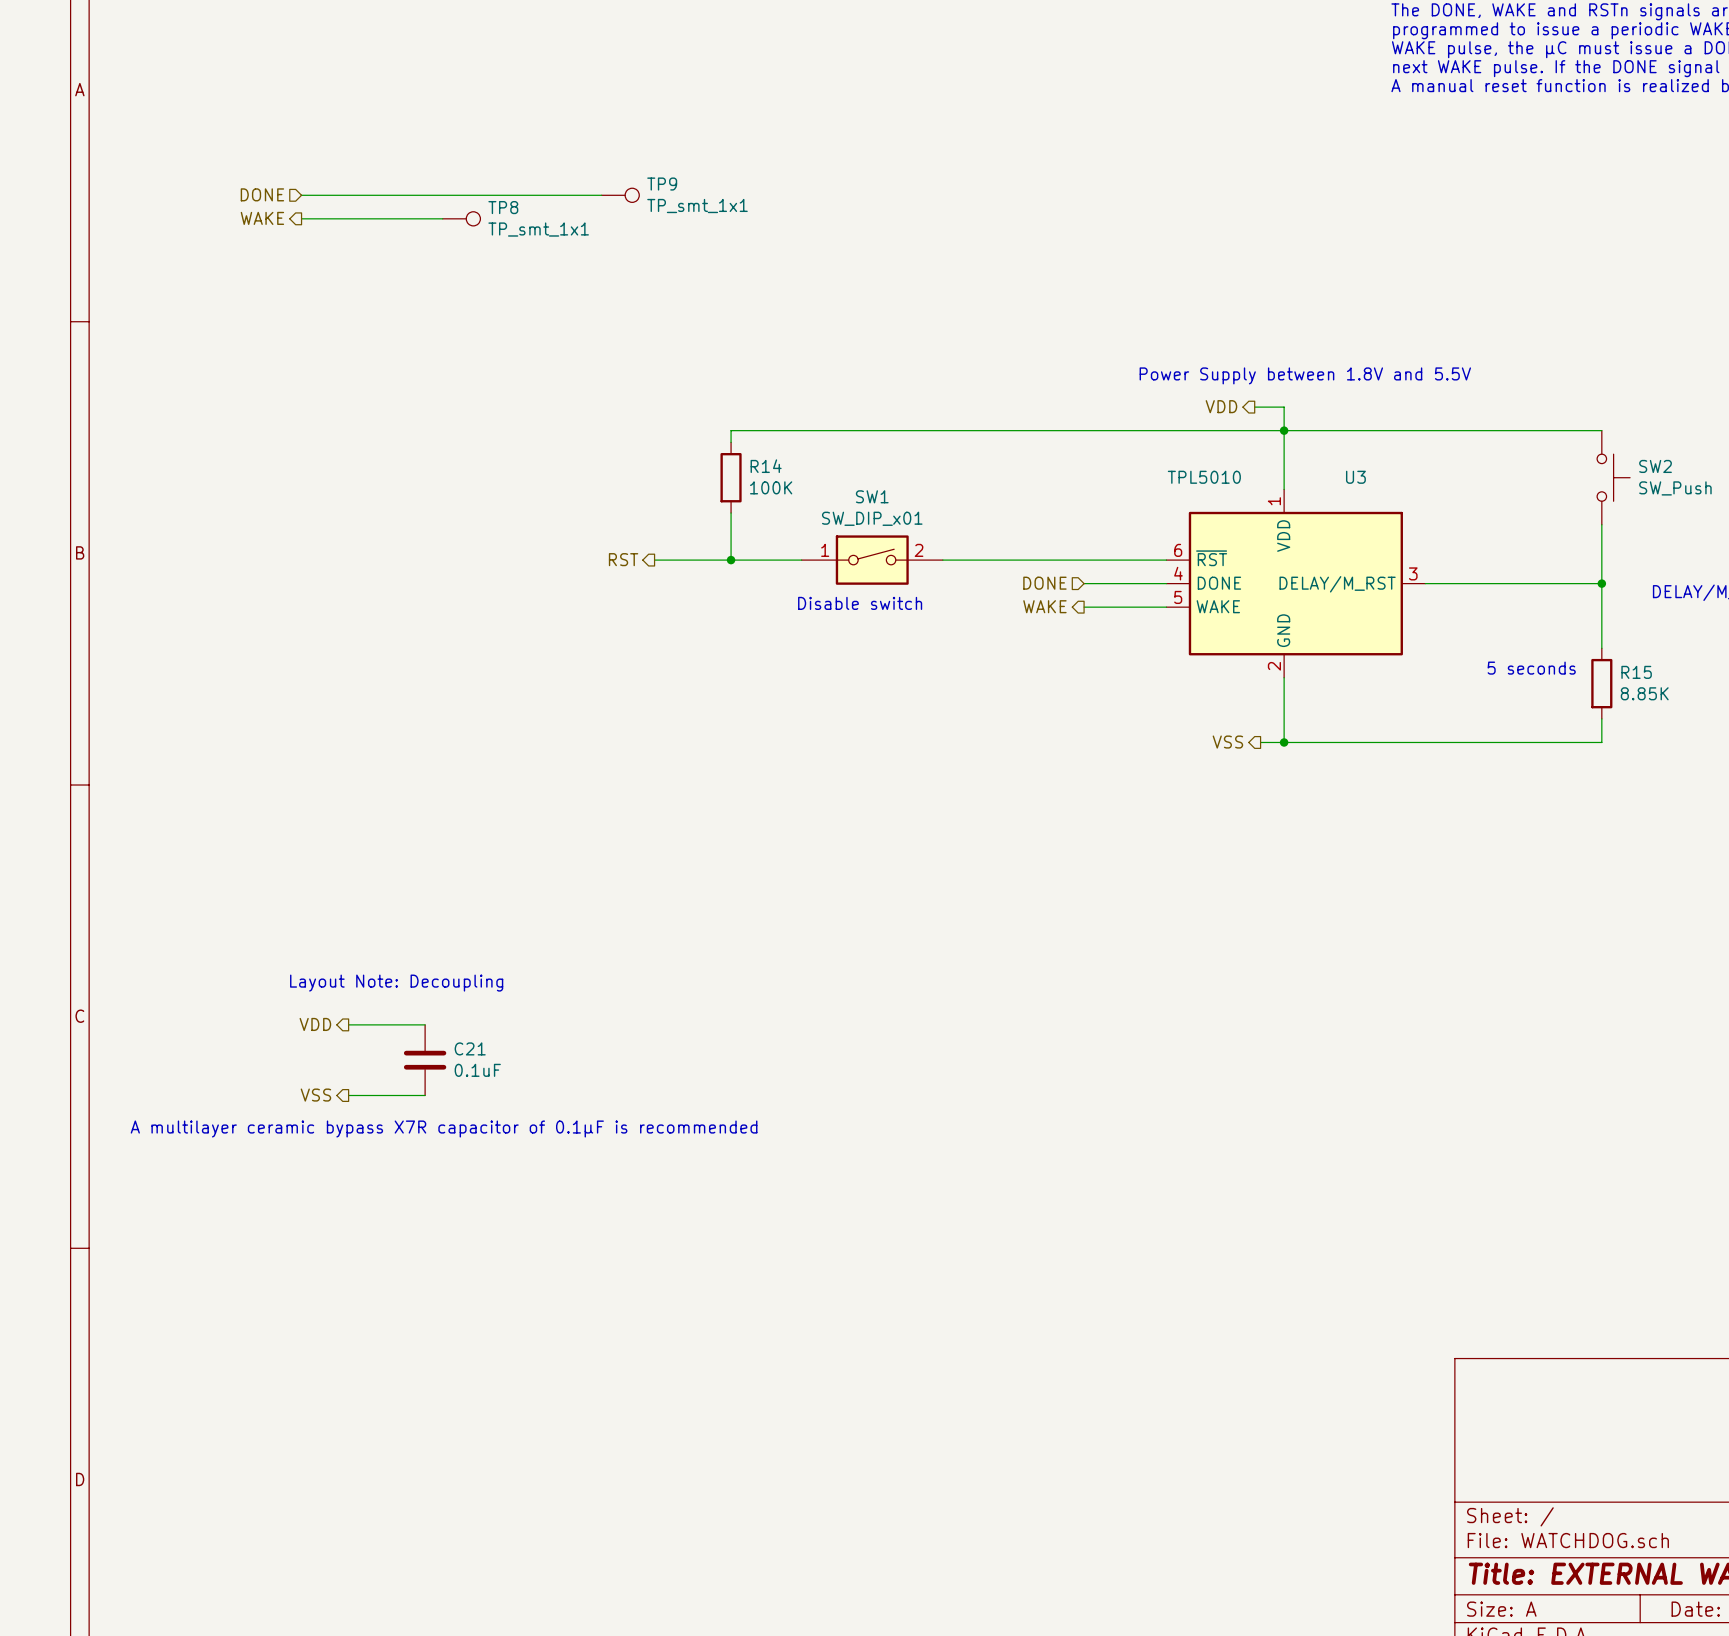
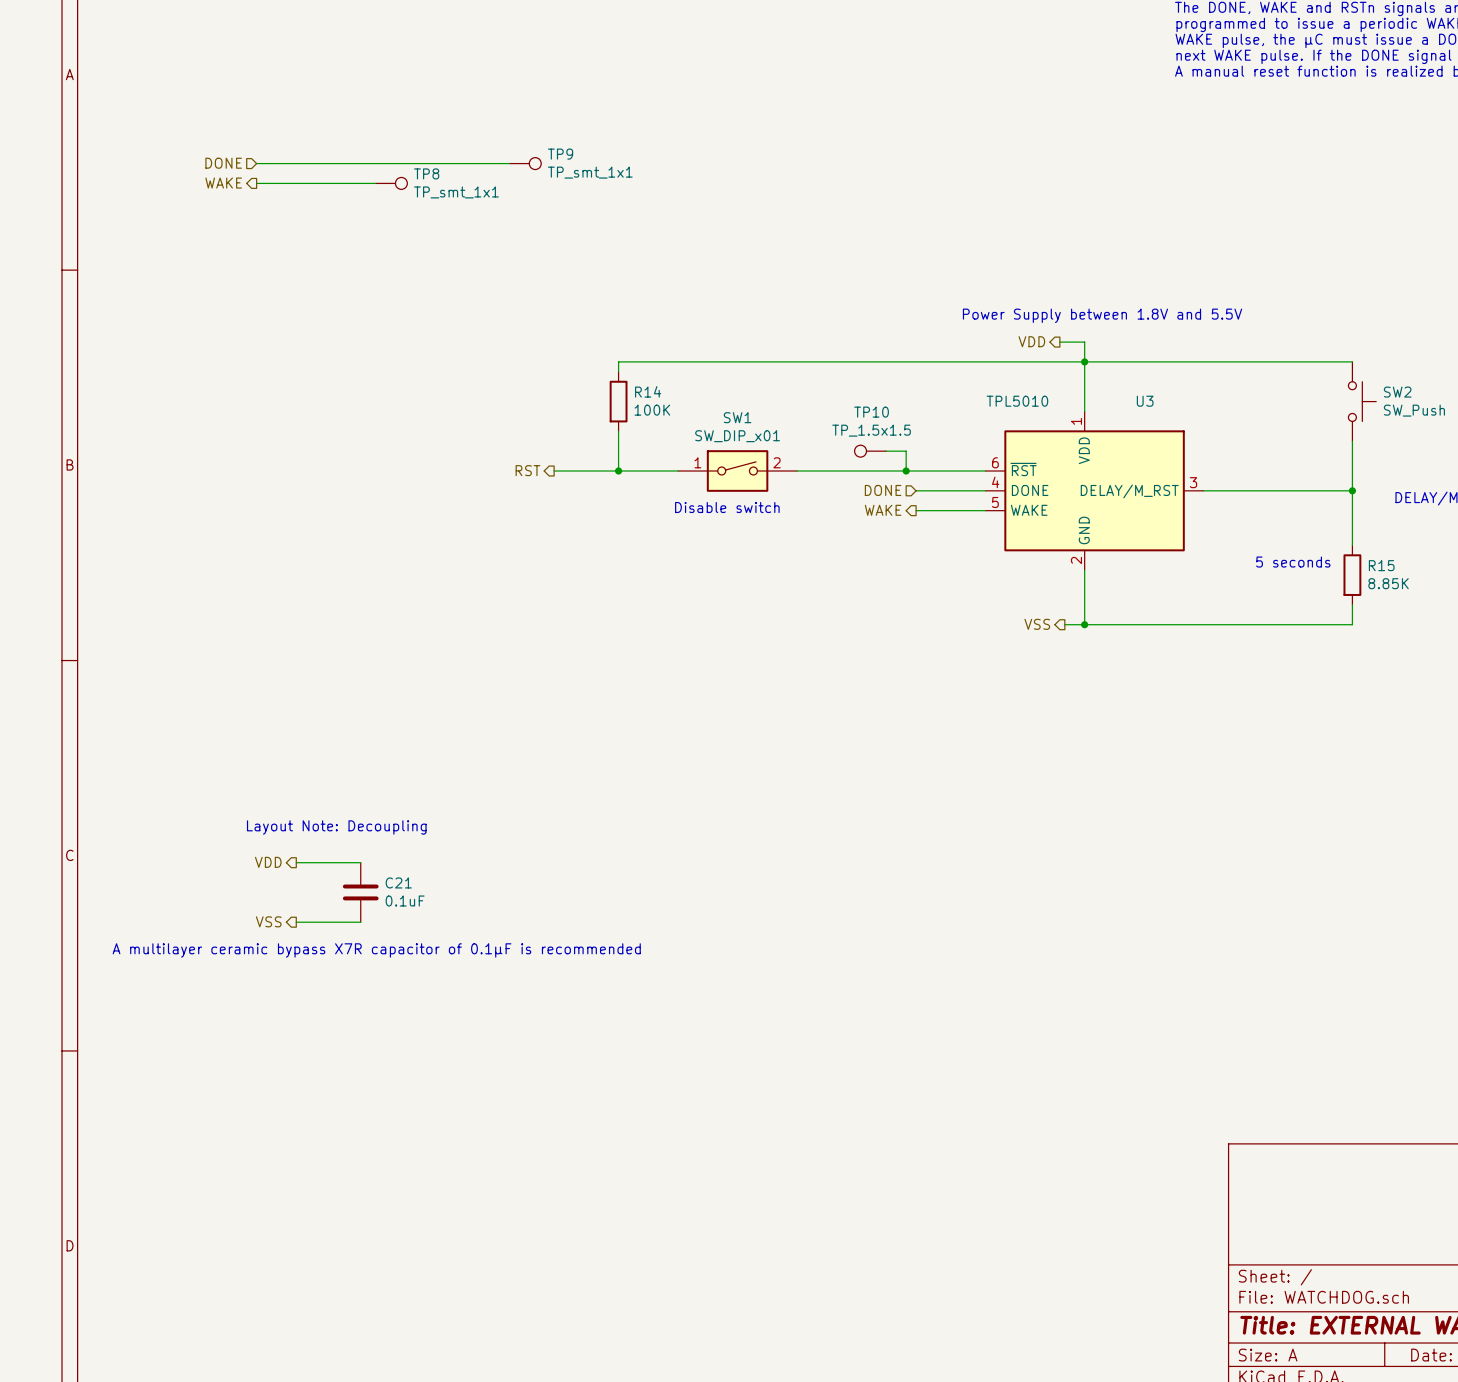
TP10: none -> TP_1.5x1.5 (870, 451)
wire: none -> (886, 451) (906, 451) (906, 471)
junction: none -> (906, 471)

